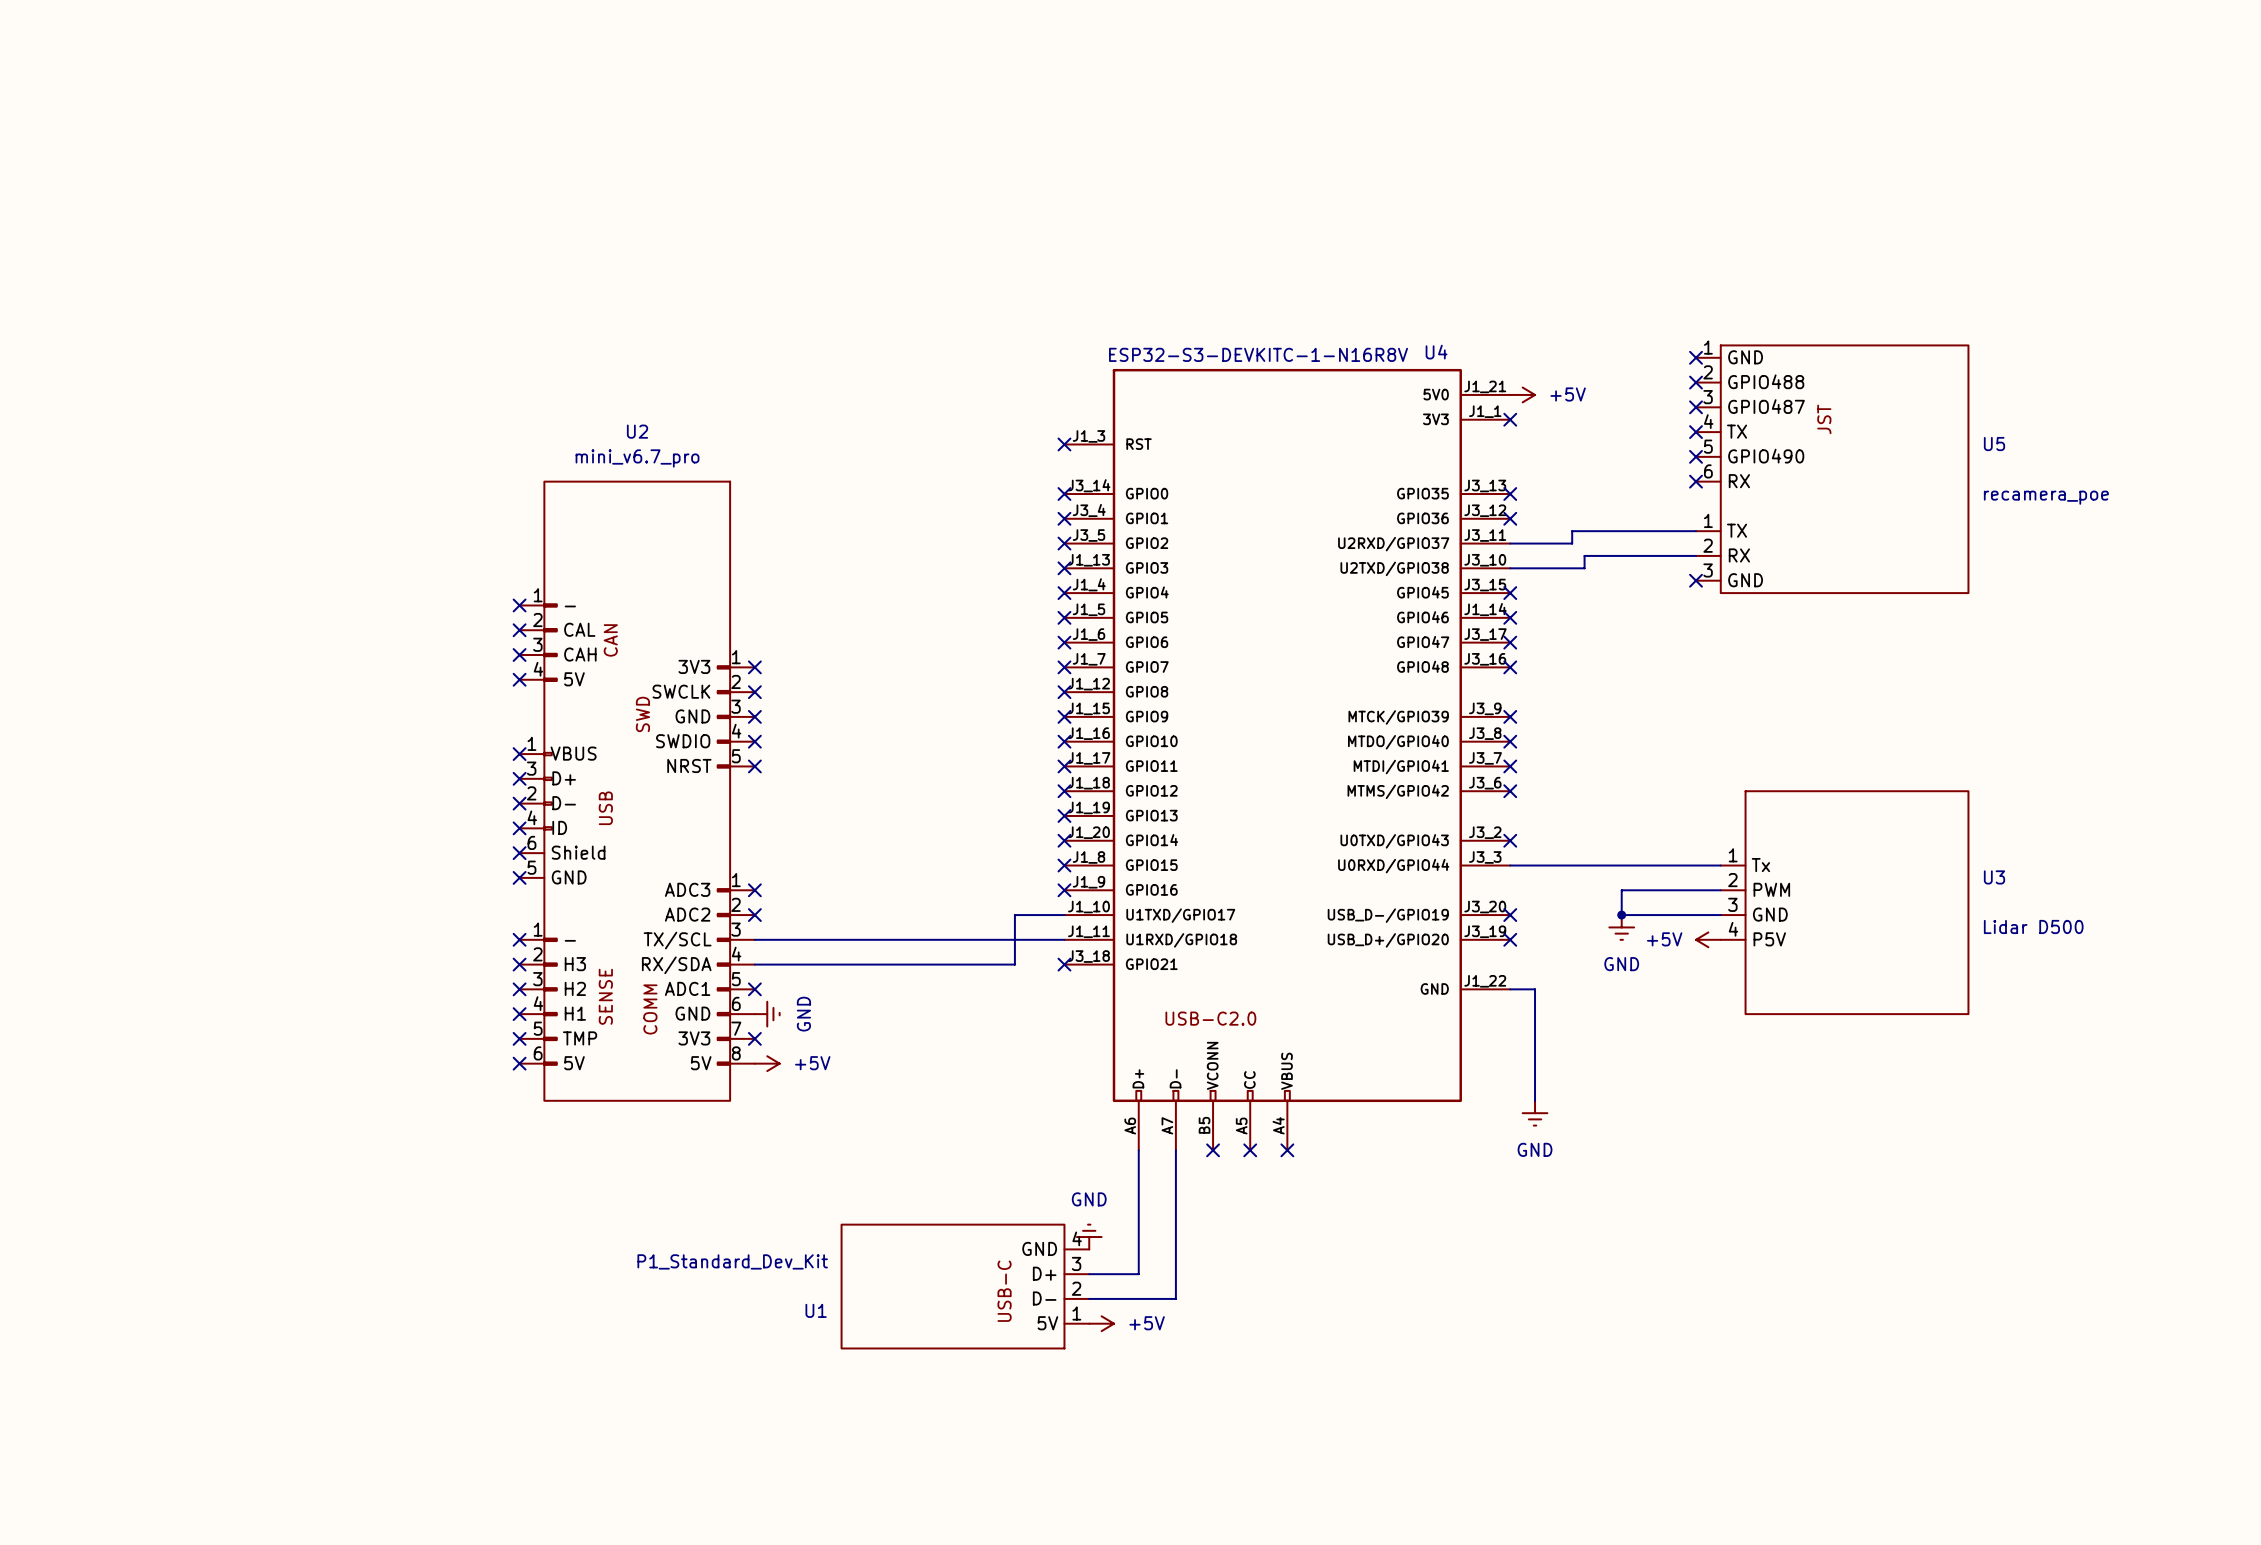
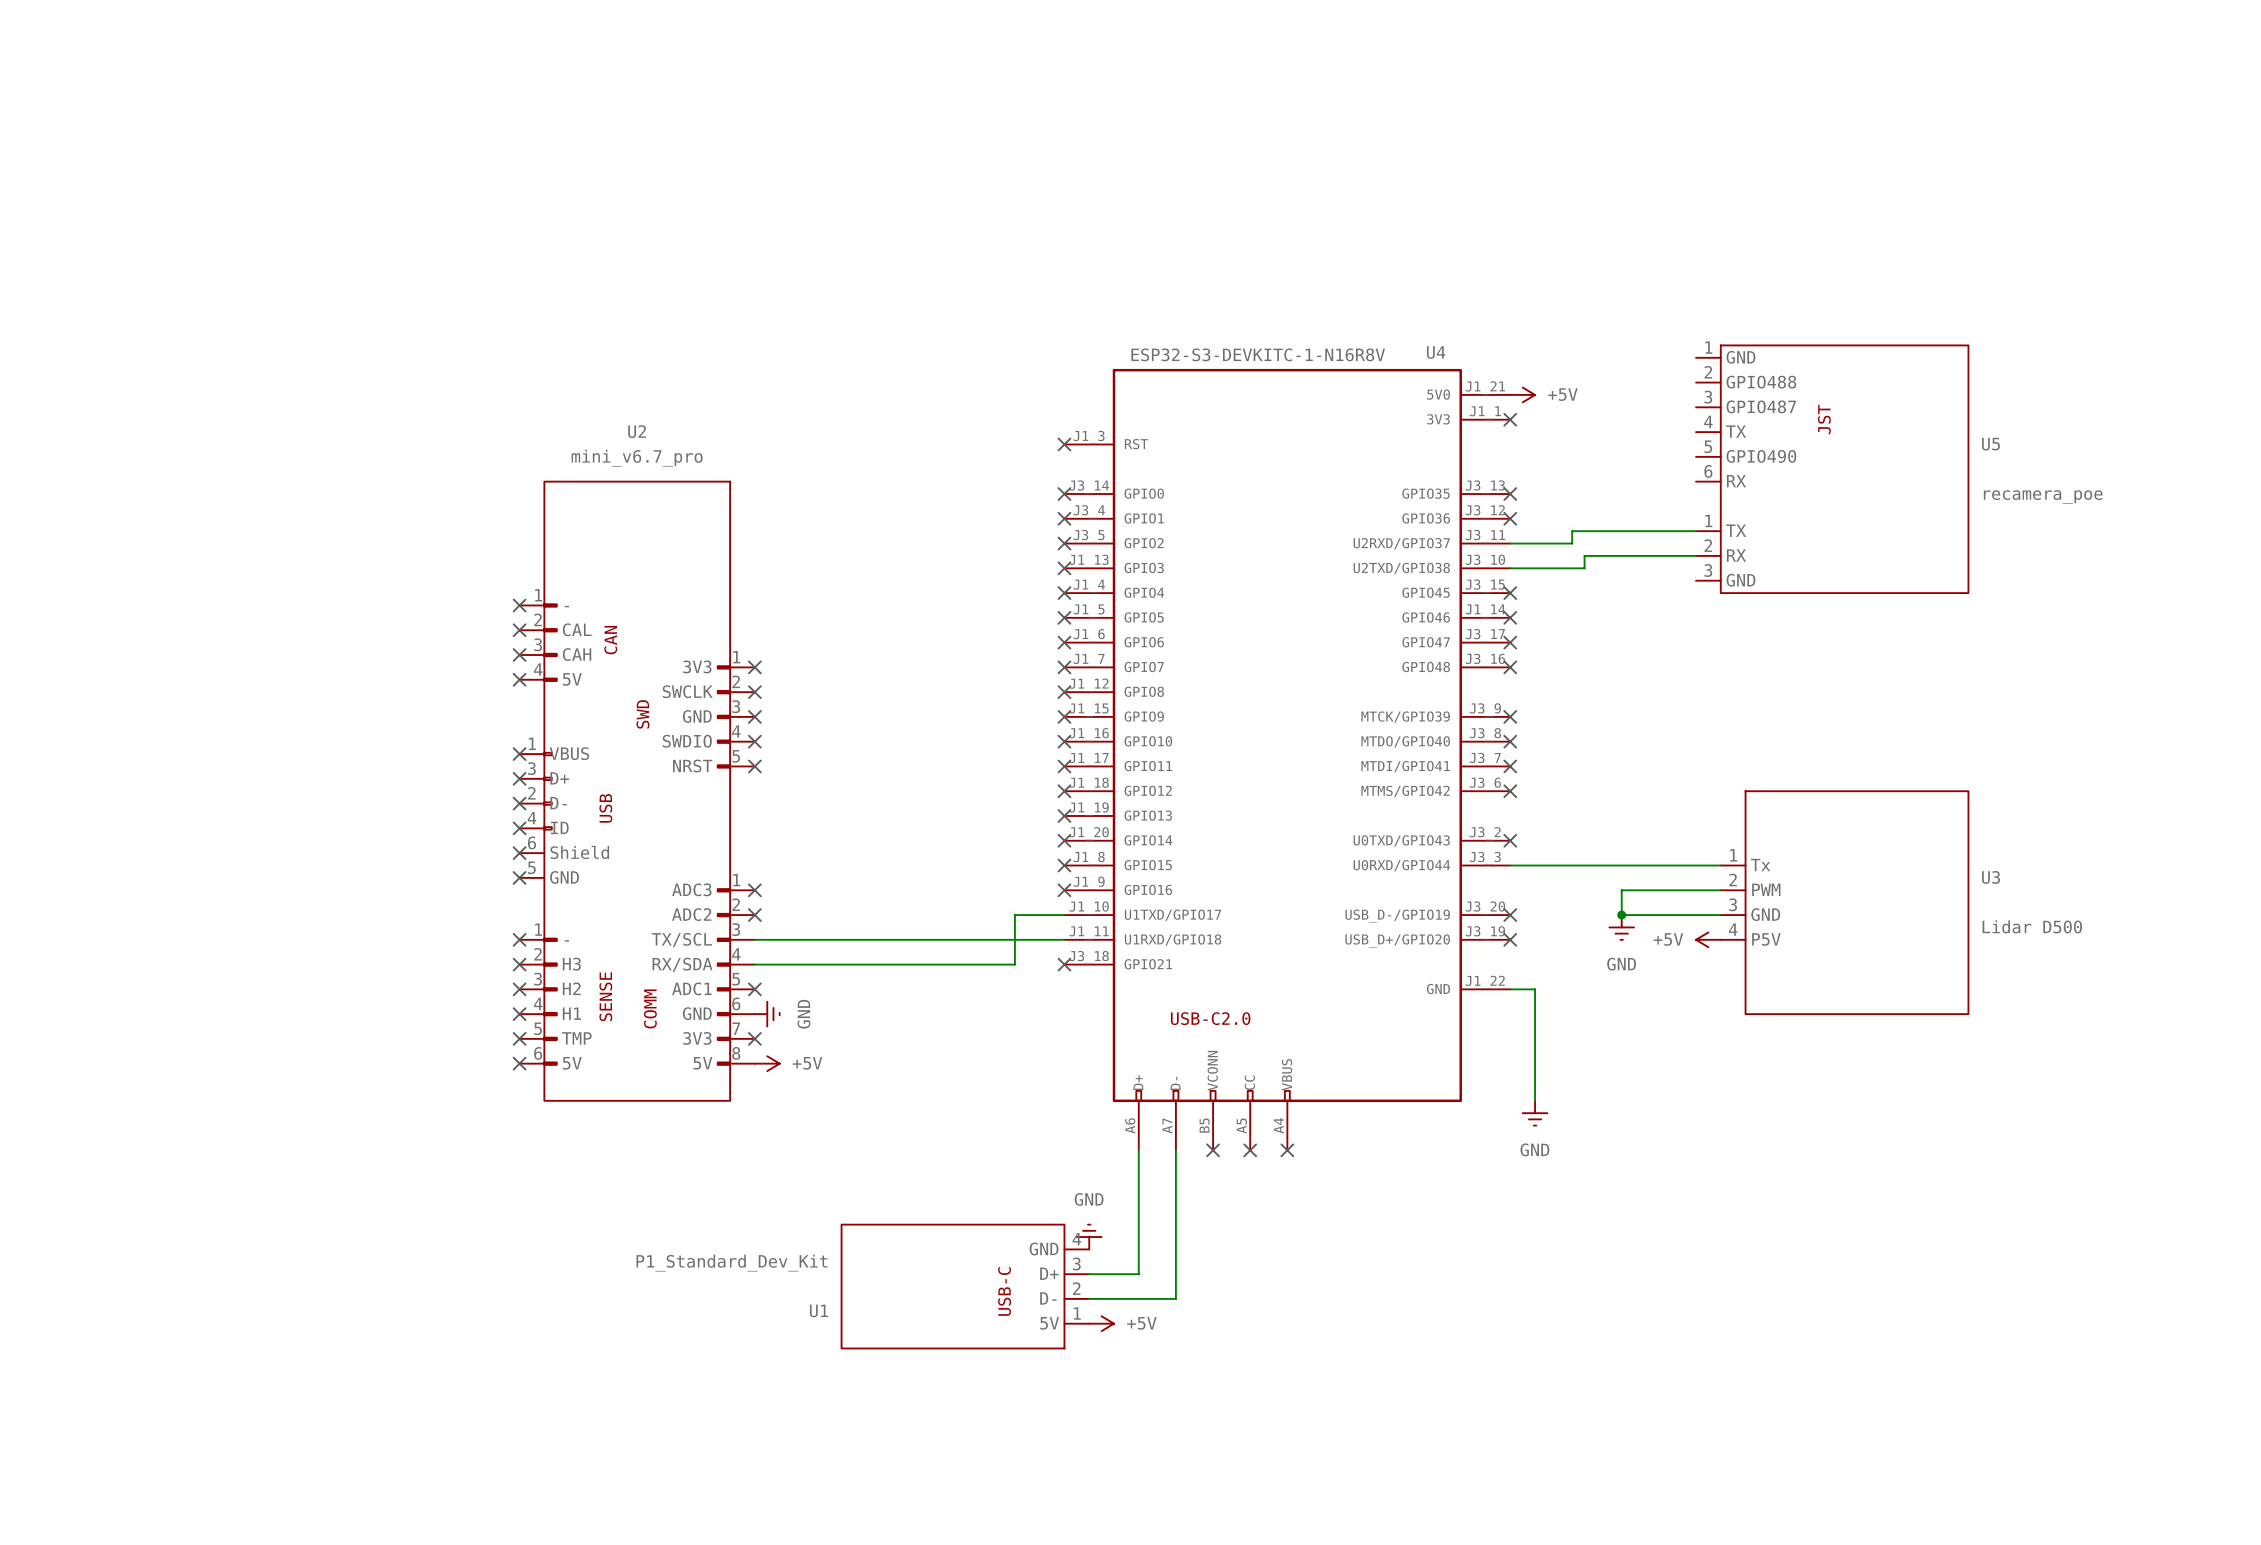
no-connect mark: (1696, 357) -> none
no-connect mark: (1696, 382) -> none
no-connect mark: (1696, 407) -> none
no-connect mark: (1696, 432) -> none
no-connect mark: (1696, 456) -> none
no-connect mark: (1696, 481) -> none
no-connect mark: (1696, 580) -> none

